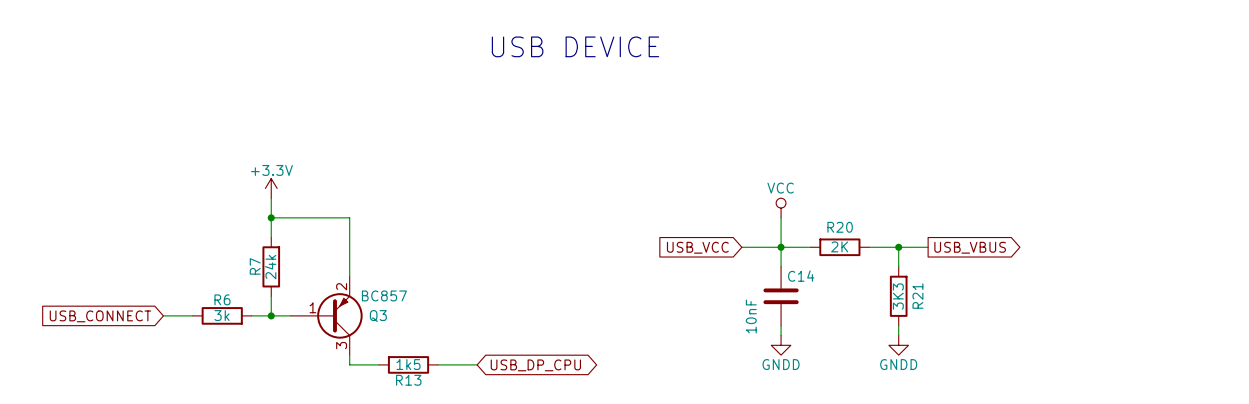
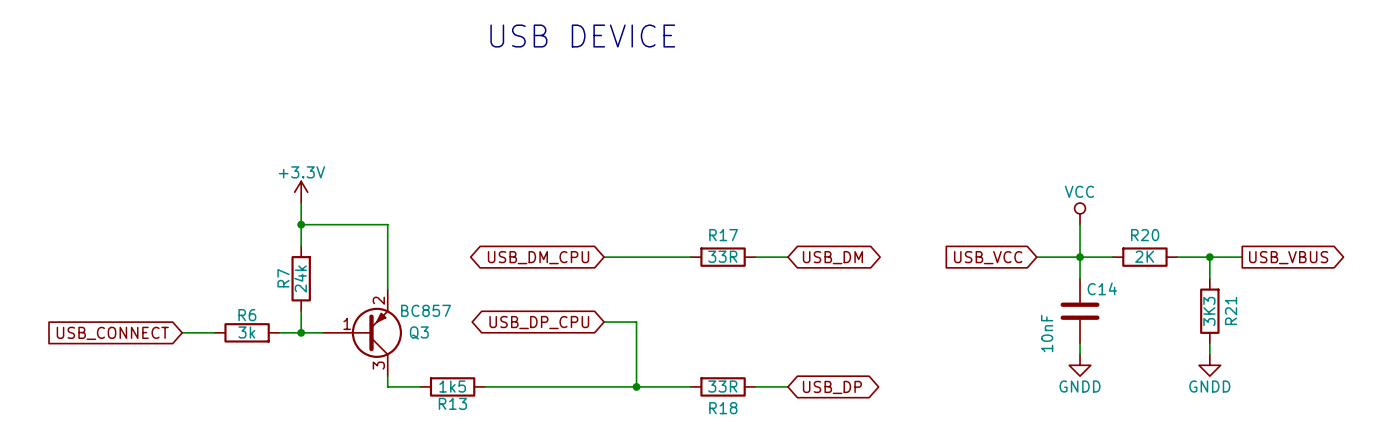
text position: USB DEVICE (575, 46) -> USB DEVICE (582, 36)
power symbol: VCC (781, 208) -> none
power symbol: none -> VCC (1080, 213)
wire: (781, 217) (781, 266) -> none
wire: none -> (1080, 224) (1080, 278)
global label: none -> USB_DM_CPU (538, 257)
wire: none -> (604, 257) (690, 257)
R17: none -> 33R (723, 257)
wire: none -> (755, 257) (787, 257)
global label shape: input (697, 247) -> bidirectional (832, 257)
global label: USB_VCC (697, 247) -> USB_DM (832, 257)
wire: (741, 247) (810, 247) -> none
junction: (781, 247) -> none
R20 position: (839, 247) -> (1144, 257)
wire: (869, 247) (928, 247) -> none
wire: (898, 247) (898, 266) -> none
junction: (898, 247) -> none
wire: none -> (1036, 257) (1112, 257)
global label shape: output (970, 247) -> input (988, 257)
global label: USB_VBUS (970, 247) -> USB_VCC (988, 257)
junction: none -> (1080, 257)
wire: none -> (1177, 257) (1242, 257)
wire: none -> (1209, 257) (1209, 278)
junction: none -> (1209, 257)
global label: none -> USB_VBUS (1288, 257)
C14 position: (781, 296) -> (1080, 311)
R21 position: (898, 296) -> (1209, 311)
wire: none -> (604, 322) (636, 322) (636, 386)
wire: (781, 325) (781, 335) -> none
wire: (898, 325) (898, 335) -> (1080, 343) (1080, 354)
wire: none -> (1209, 343) (1209, 354)
power symbol: GNDD (781, 345) -> none
power symbol position: GNDD (898, 345) -> GNDD (1080, 365)
power symbol: none -> GNDD (1209, 365)
wire: none -> (528, 386) (690, 386)
junction: none -> (636, 386)
R18: none -> 33R (723, 386)
wire: none -> (755, 386) (787, 386)
global label rotation: 0° (535, 365) -> 180° (539, 322)
global label: none -> USB_DP (832, 387)

